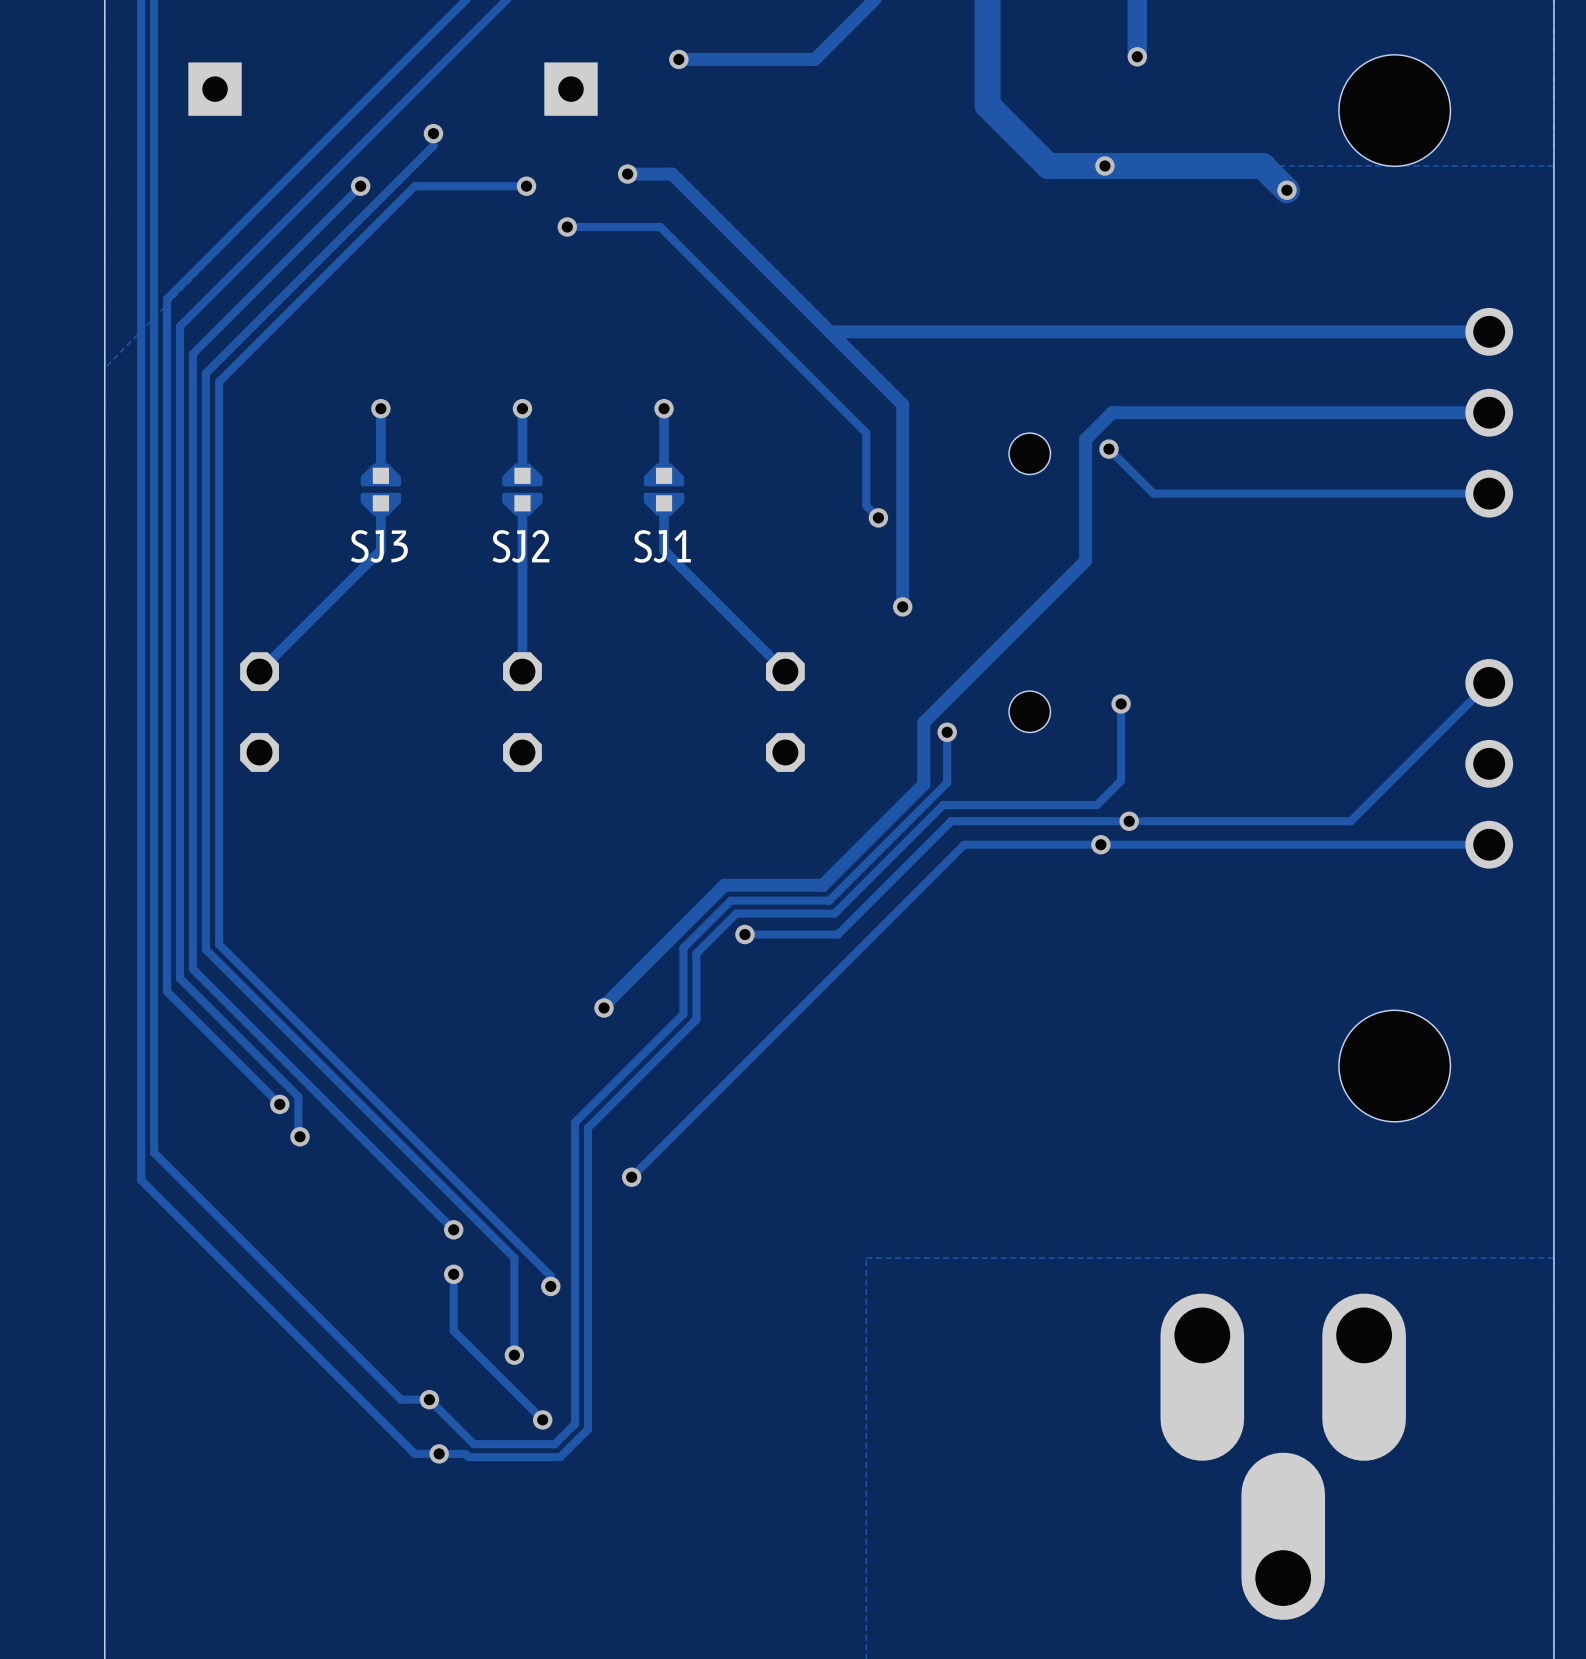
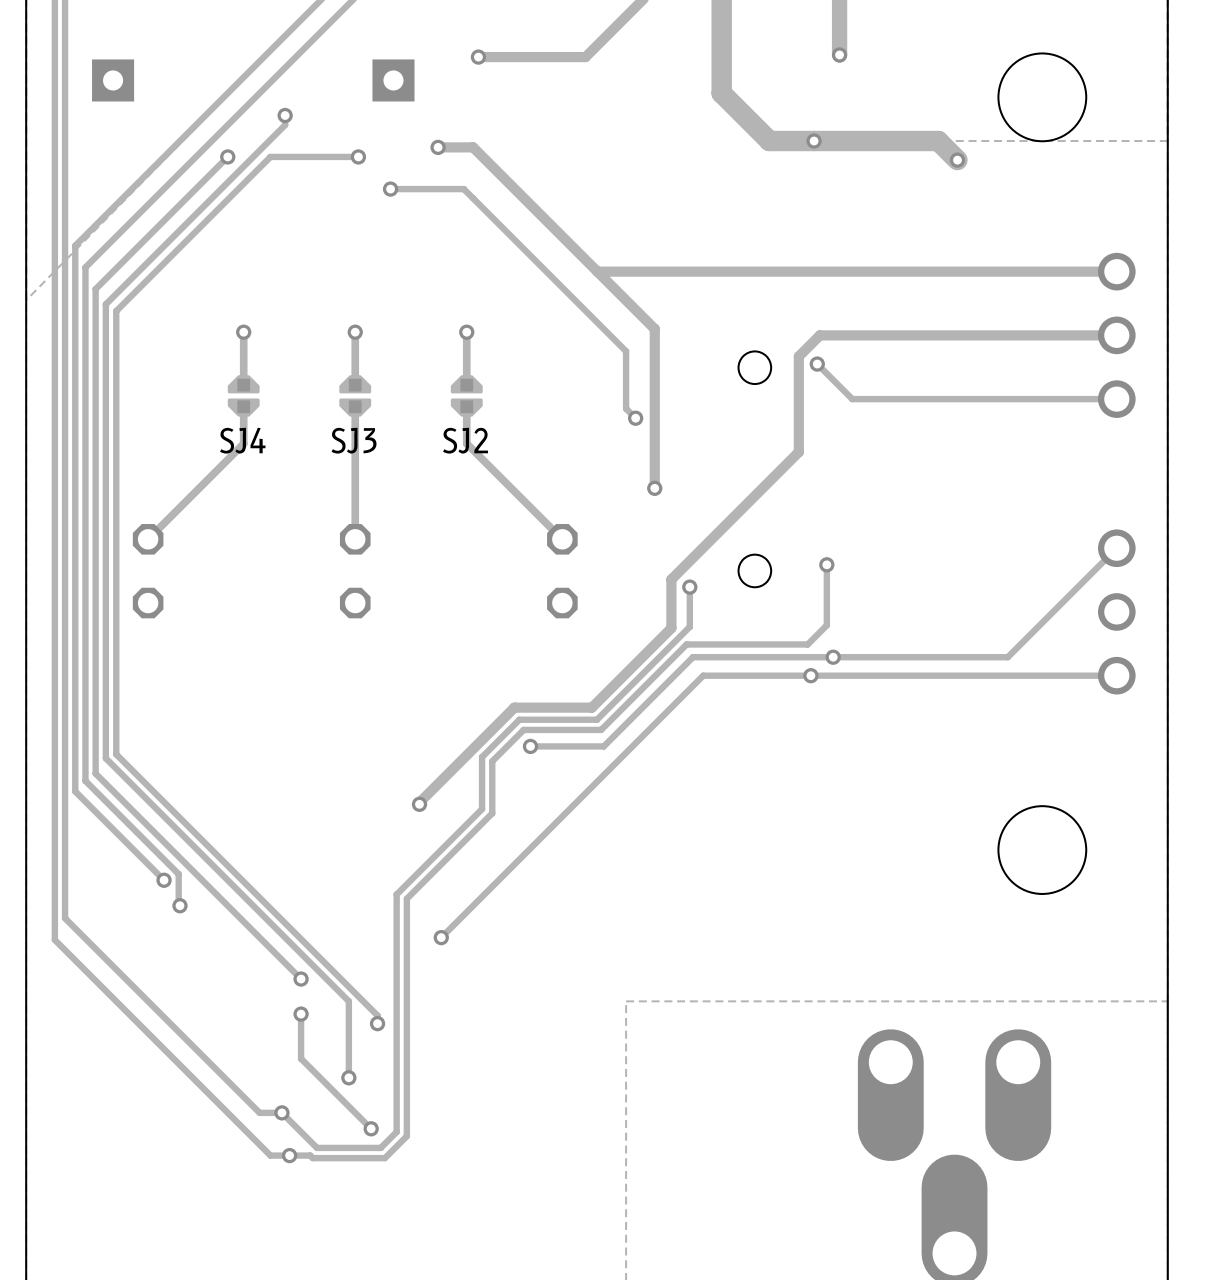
SJ3 name: SJ3 (379, 546) -> SJ4 (242, 440)
SJ2 name: SJ2 (520, 546) -> SJ3 (354, 440)
SJ1 name: SJ1 (662, 546) -> SJ2 (465, 440)

